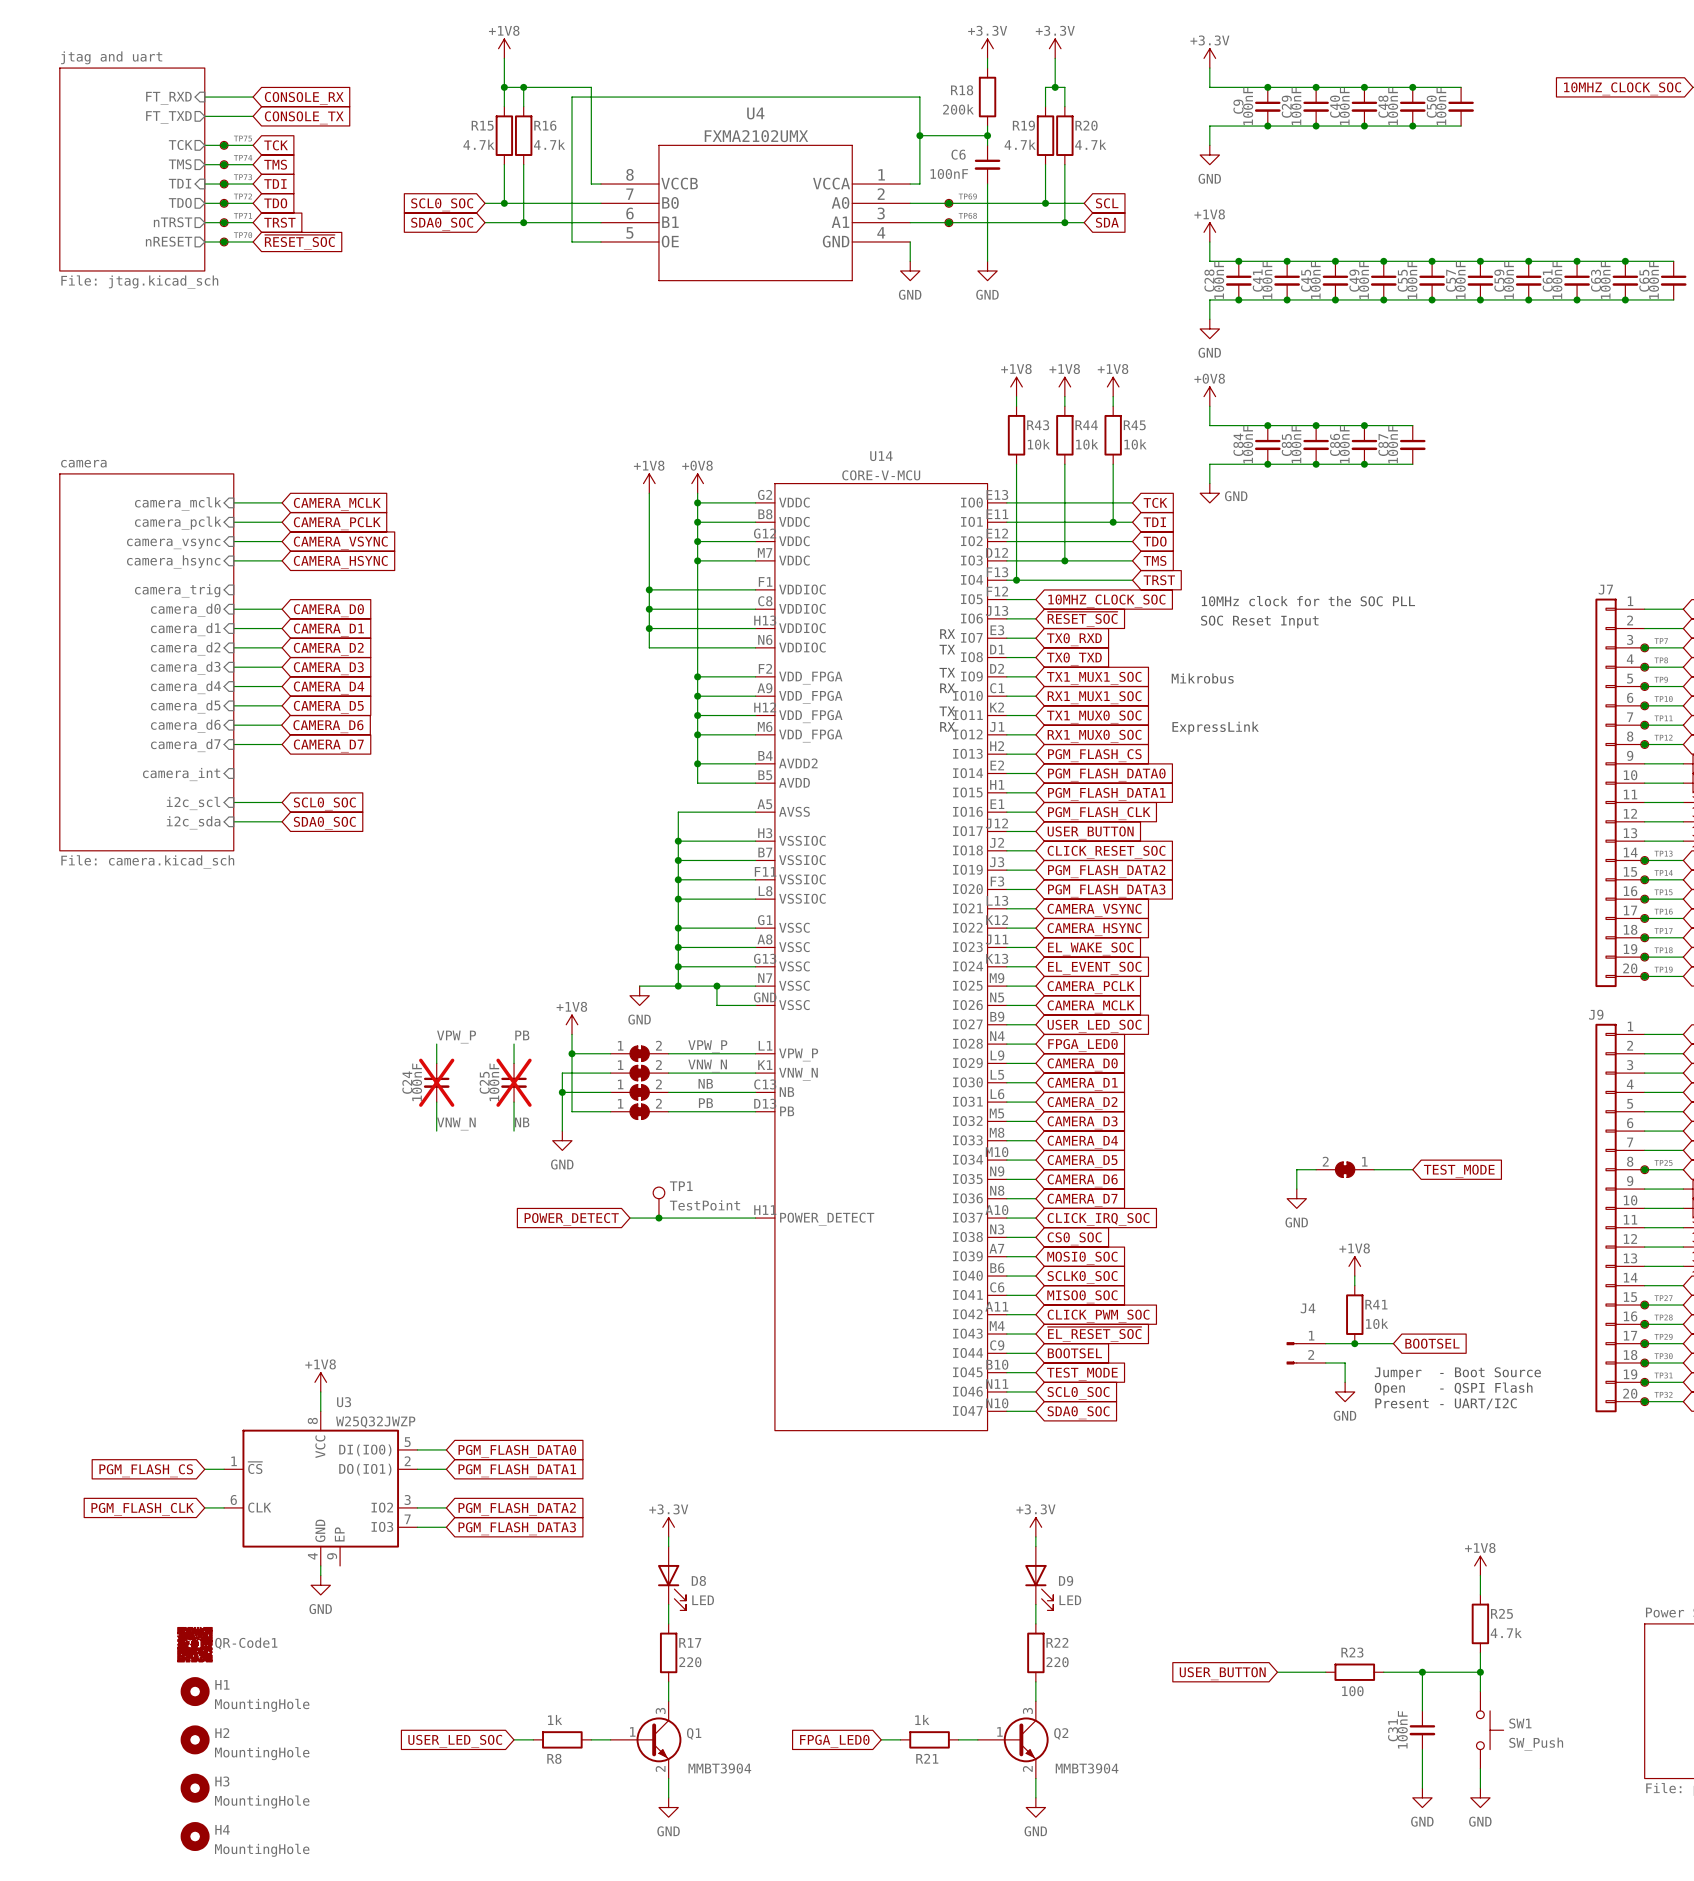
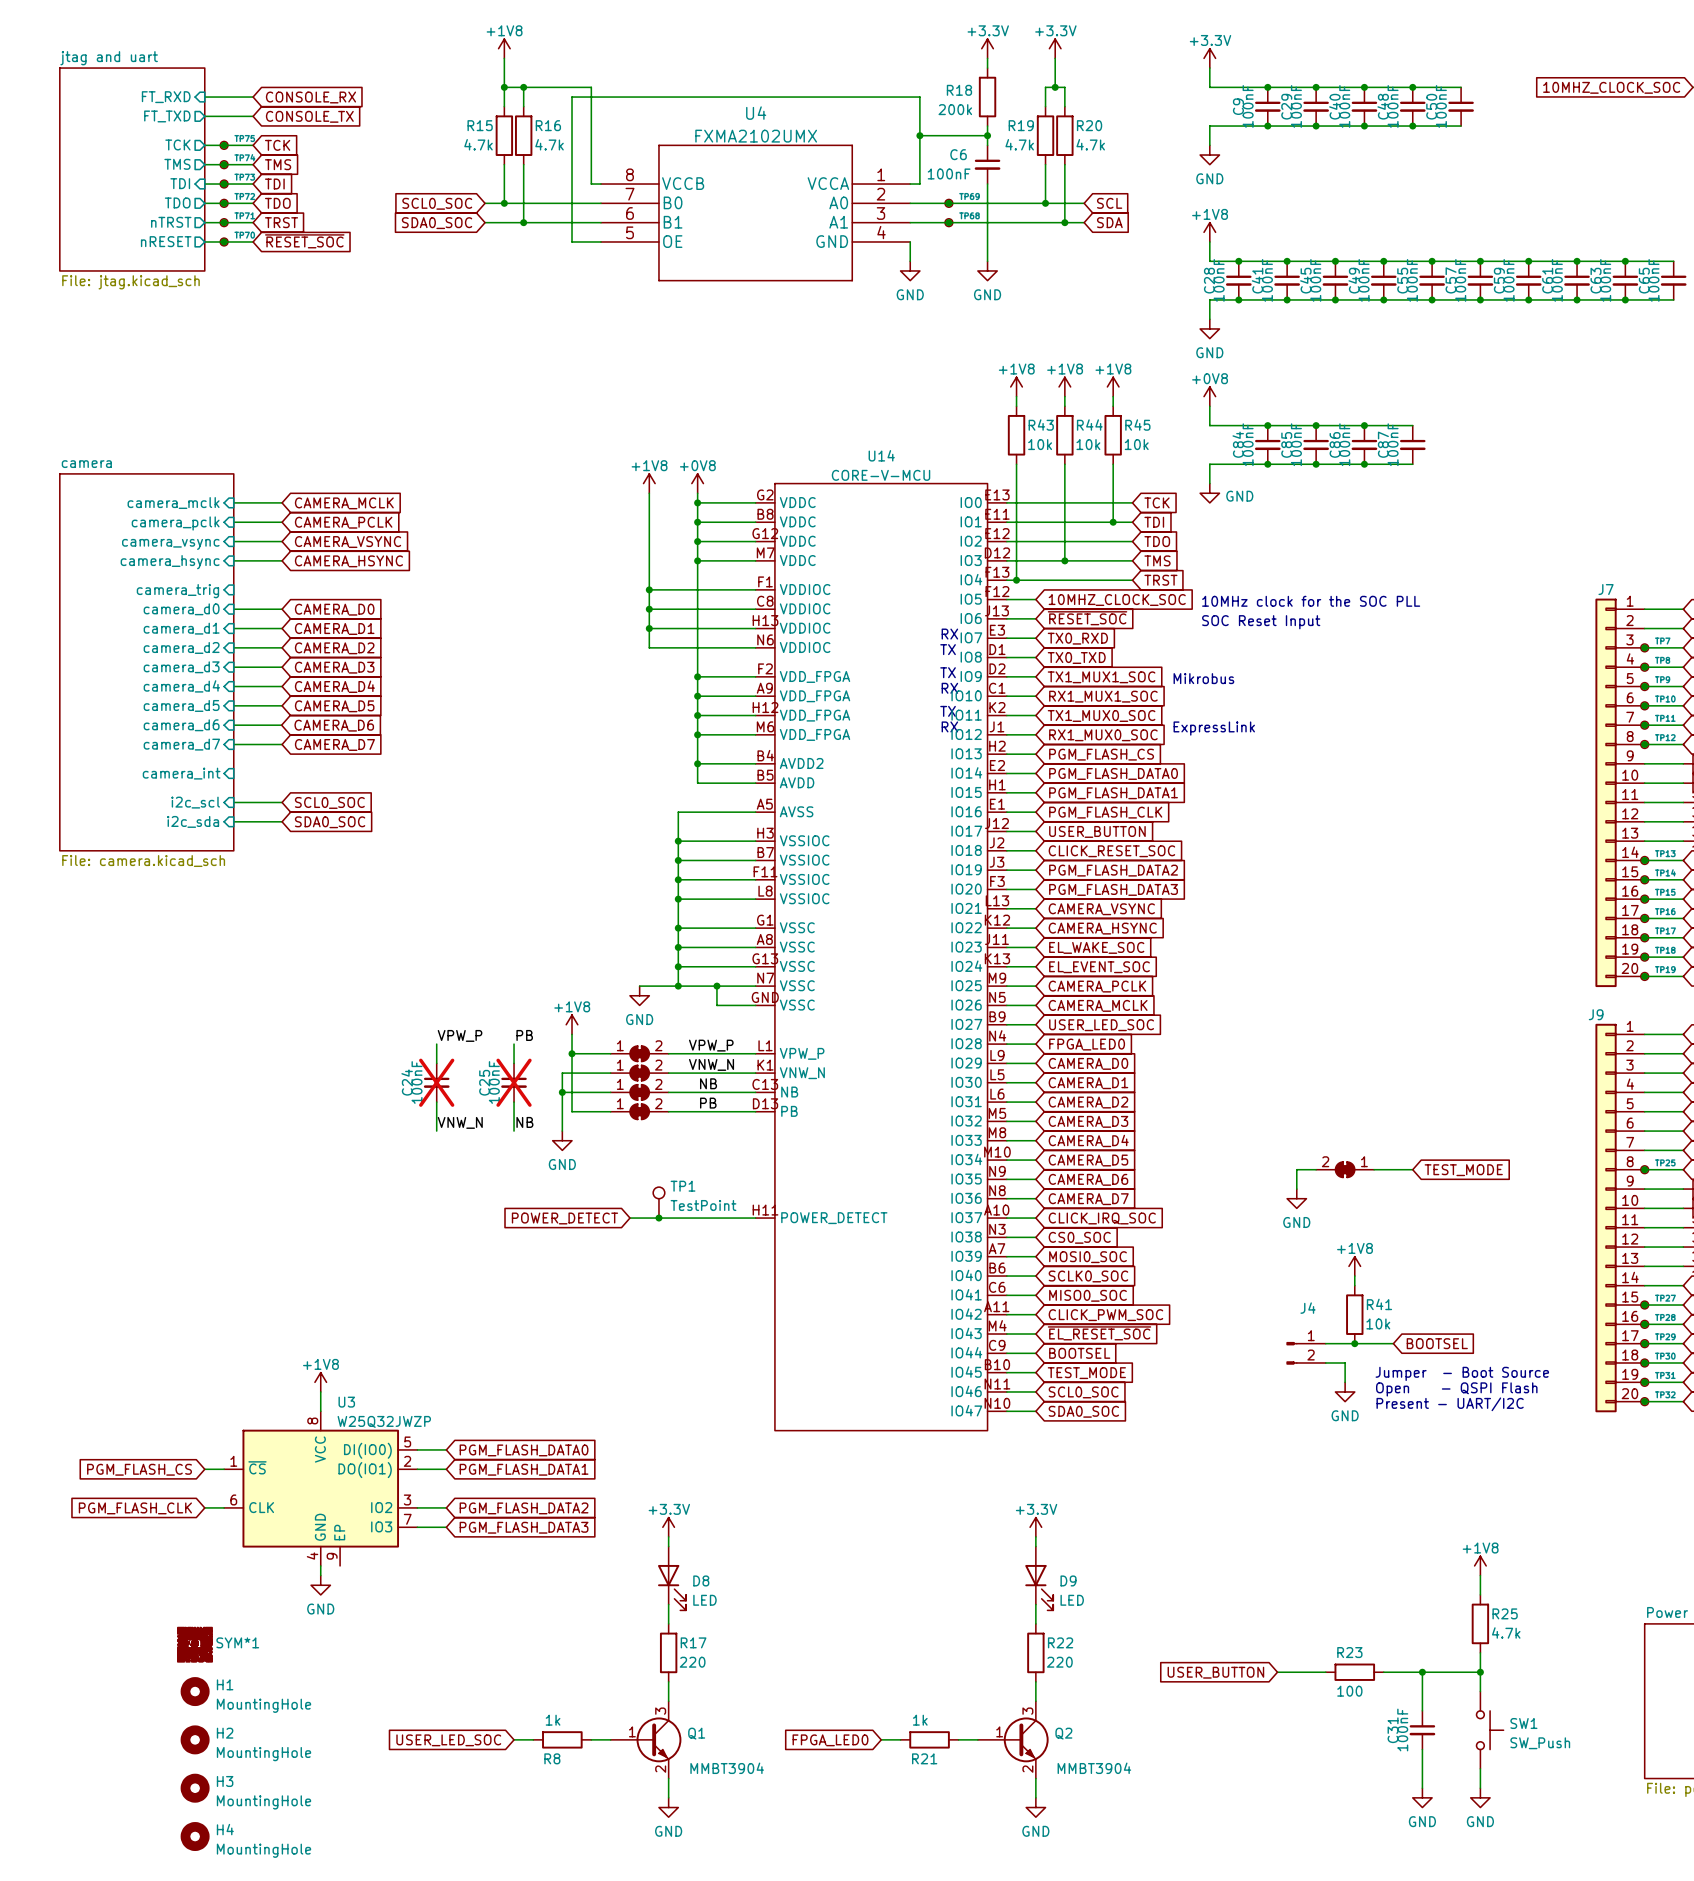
QR-Code1 name: QR-Code1 (246, 1643) -> SYM*1 (237, 1642)

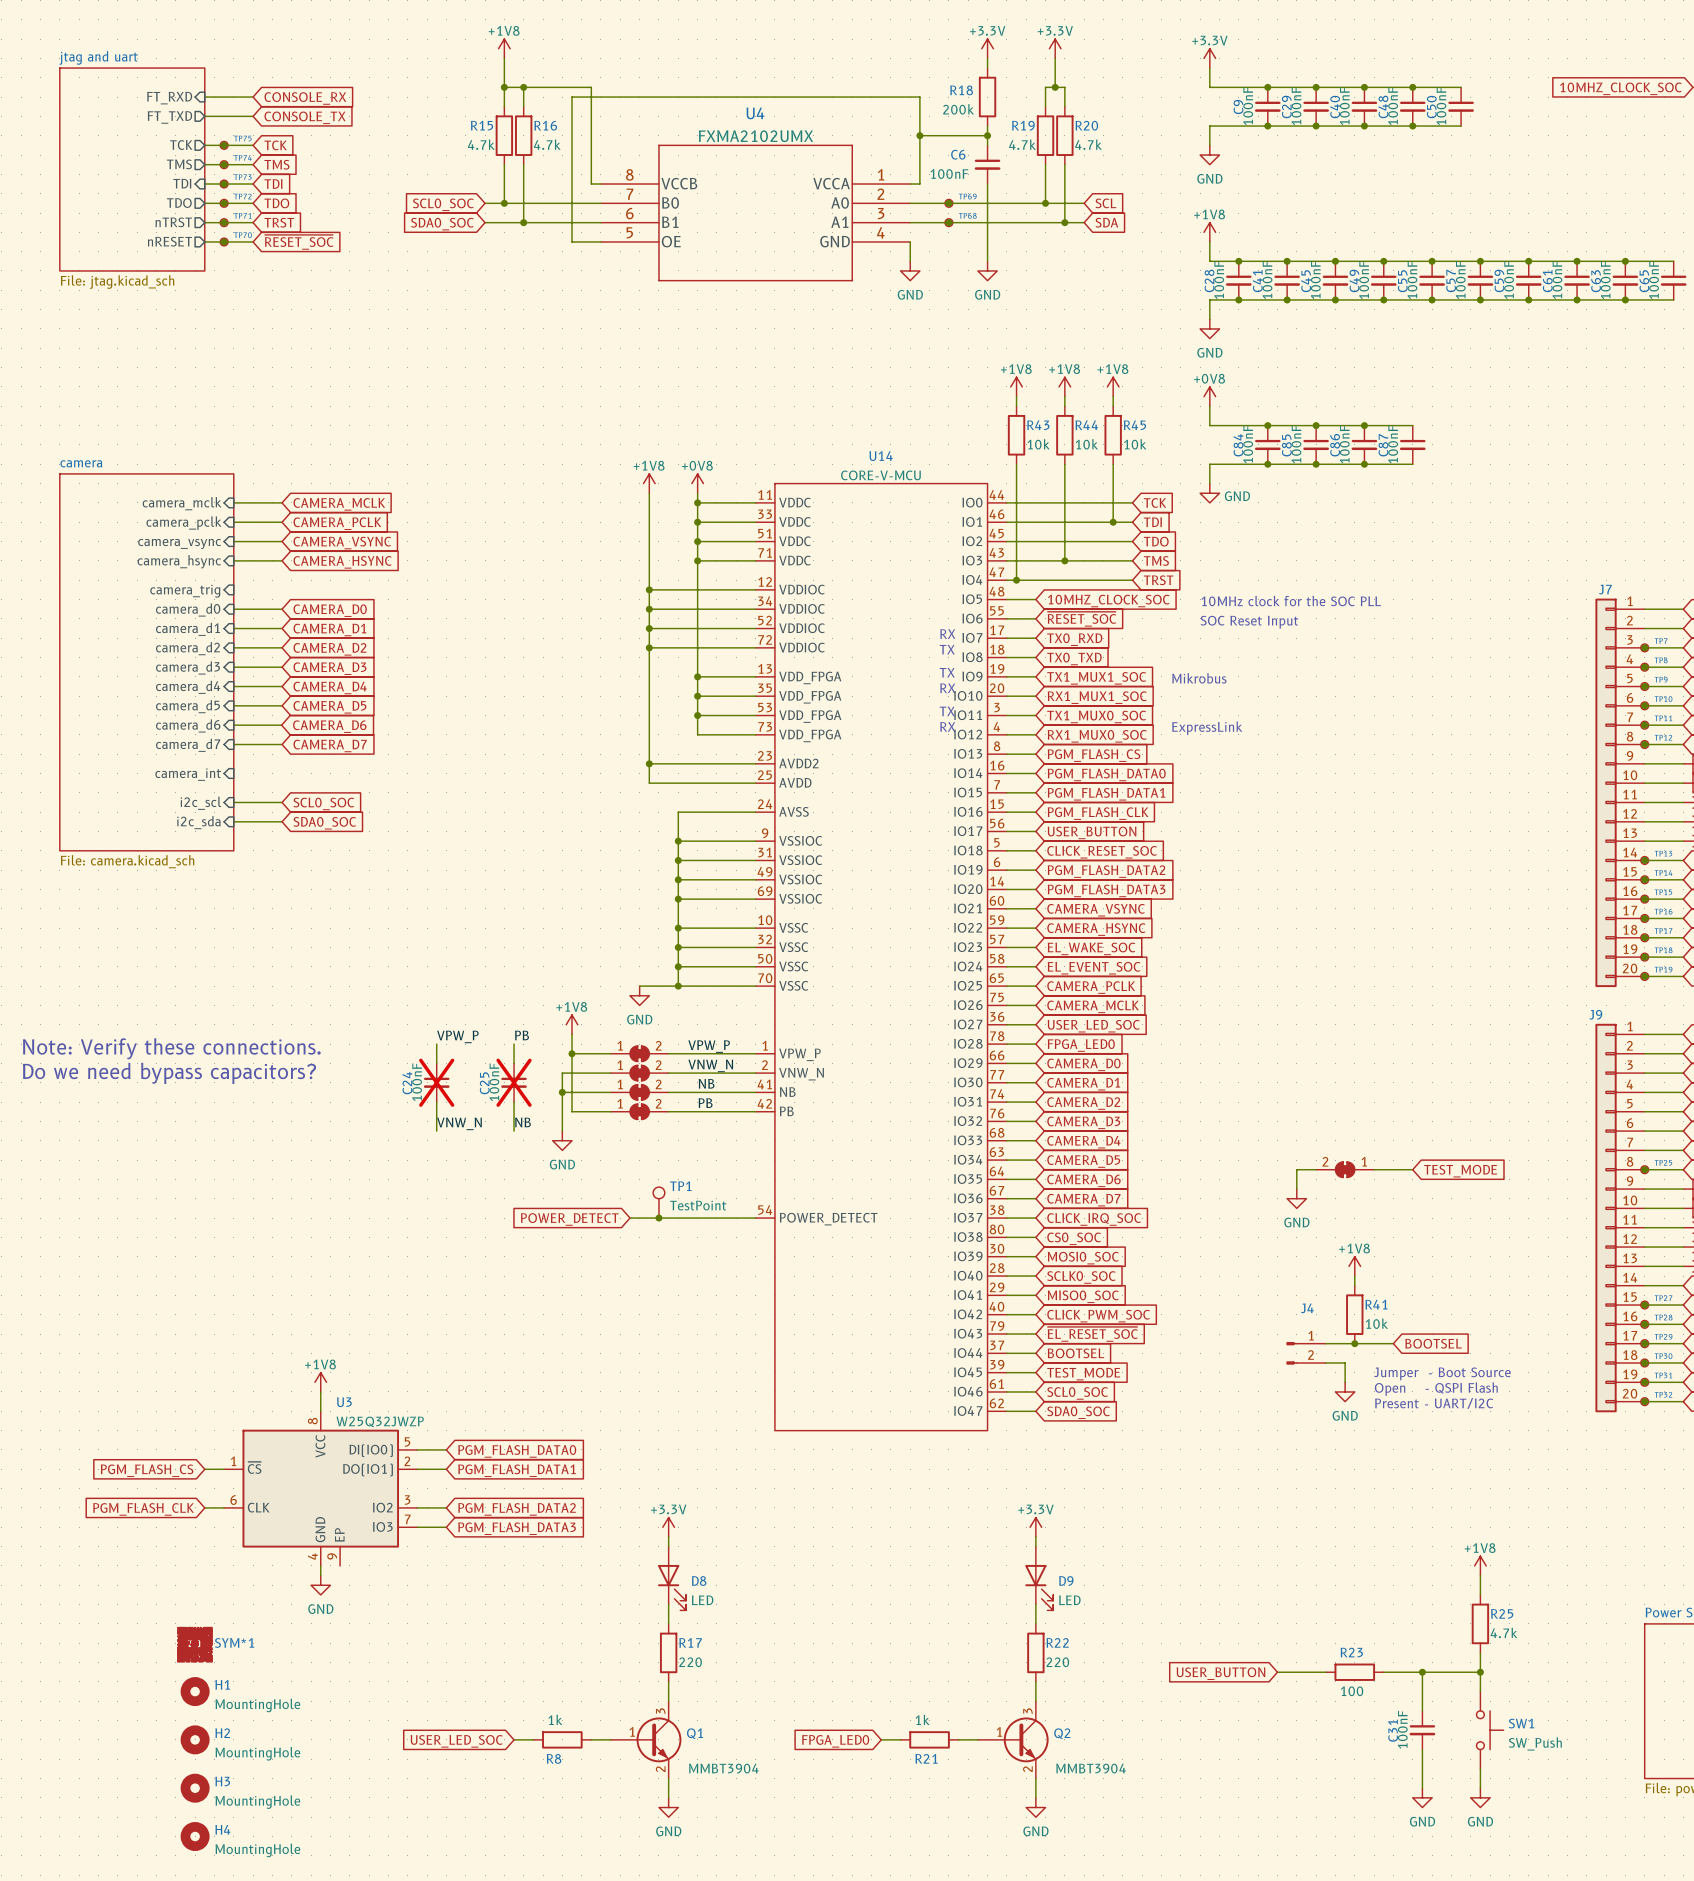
U14 symbol: [755, 483, 1007, 1431] -> [755, 483, 1007, 1431]
junction: none -> (649, 647)
wire: (697, 734) (697, 783) -> (649, 647) (649, 783) (697, 783)
junction: (697, 734) -> none
wire: none -> (649, 763) (697, 763)
junction: none -> (649, 763)
junction: (697, 763) -> none
wire: (716, 986) (716, 1005) (755, 1005) -> none
junction: (716, 986) -> none
text: none -> Note: Verify these connections. (171, 1048)
text: none -> Do we need bypass capacitors? (169, 1073)

